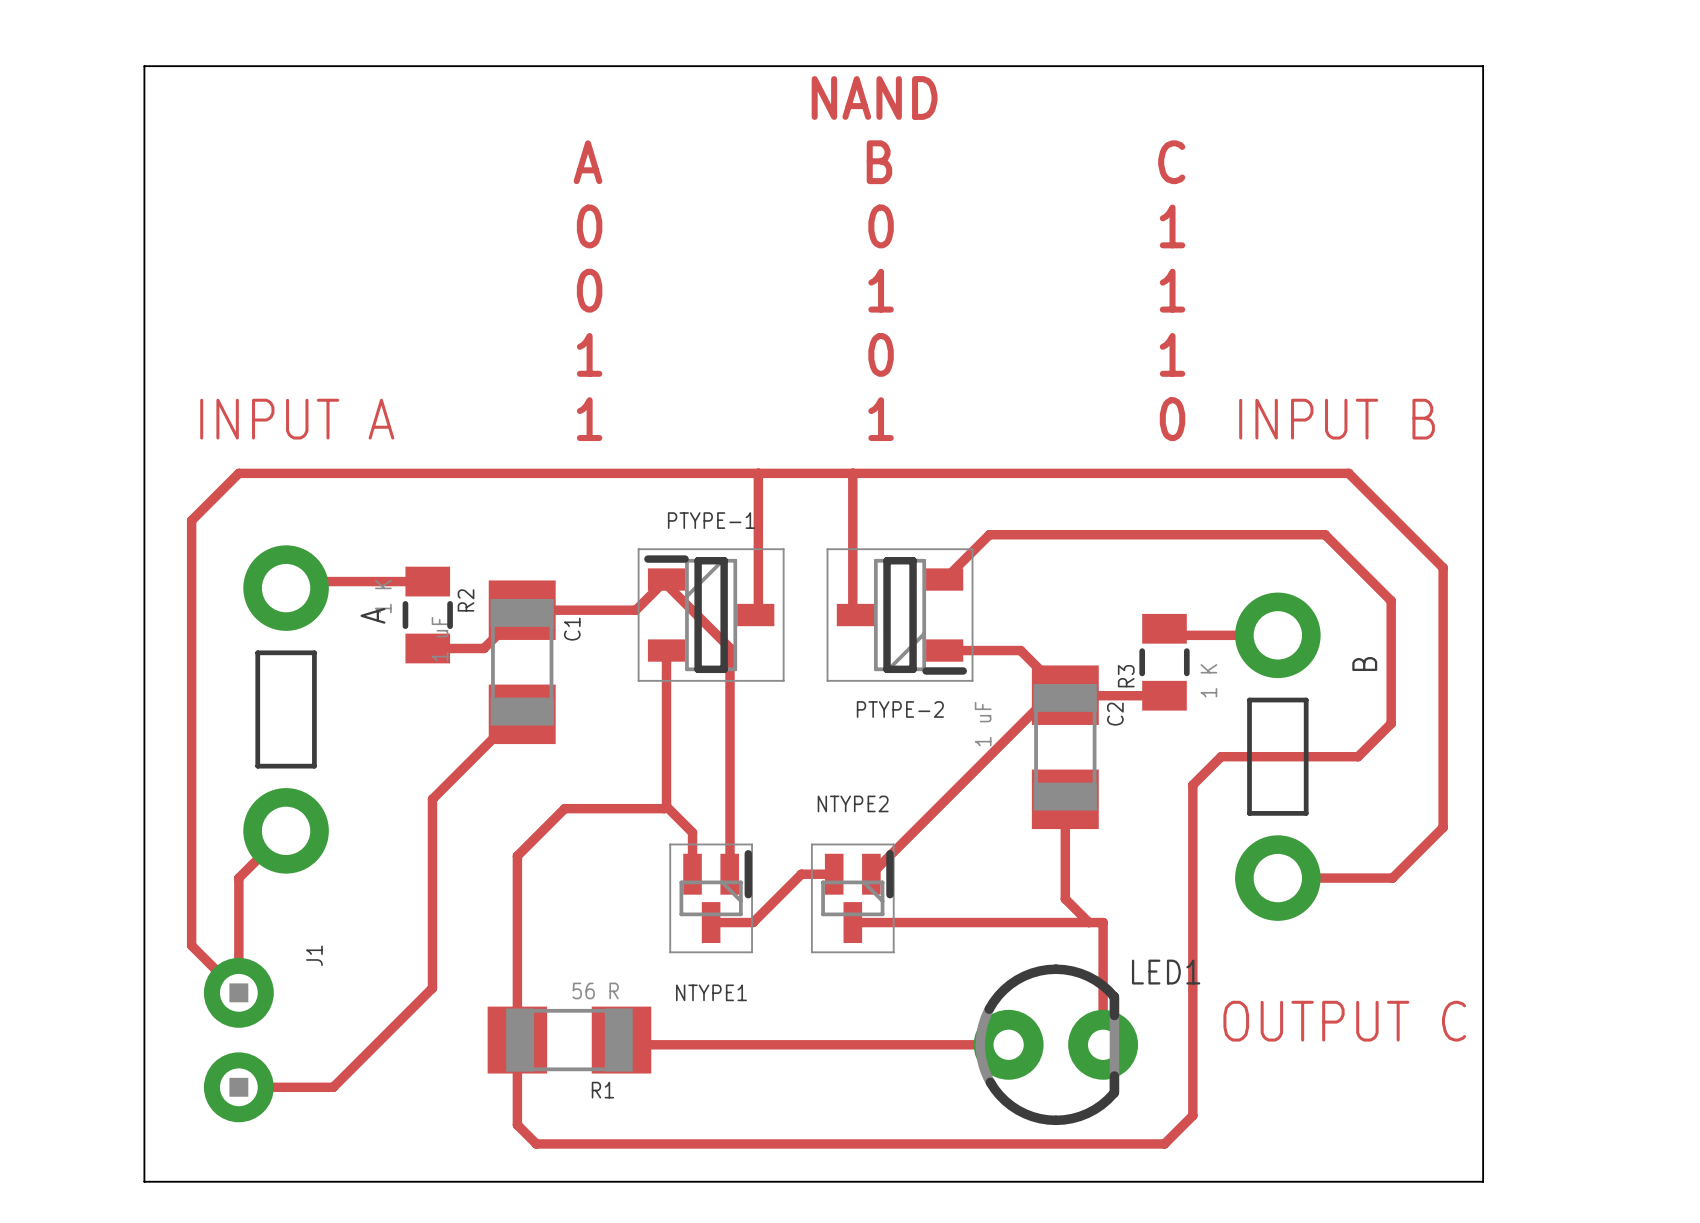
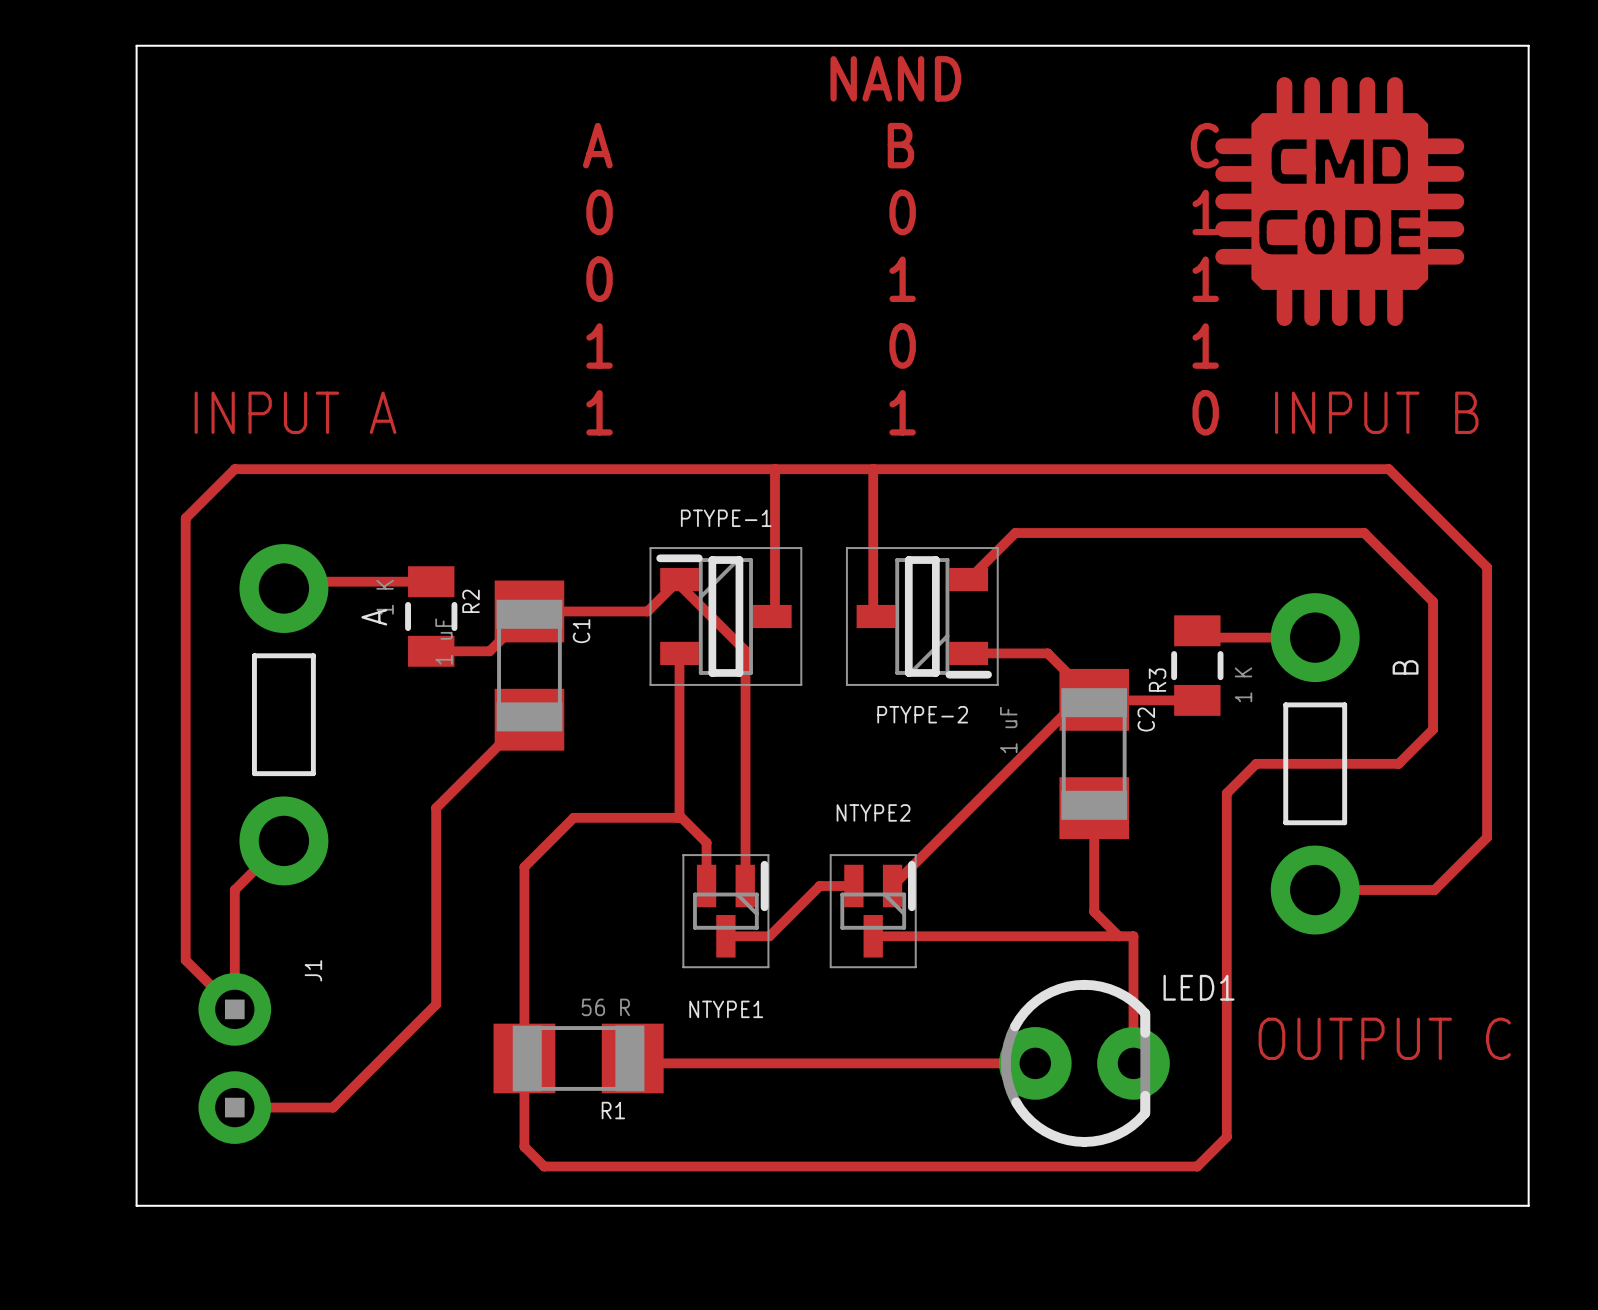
drawing: none -> [1215, 77, 1465, 327]

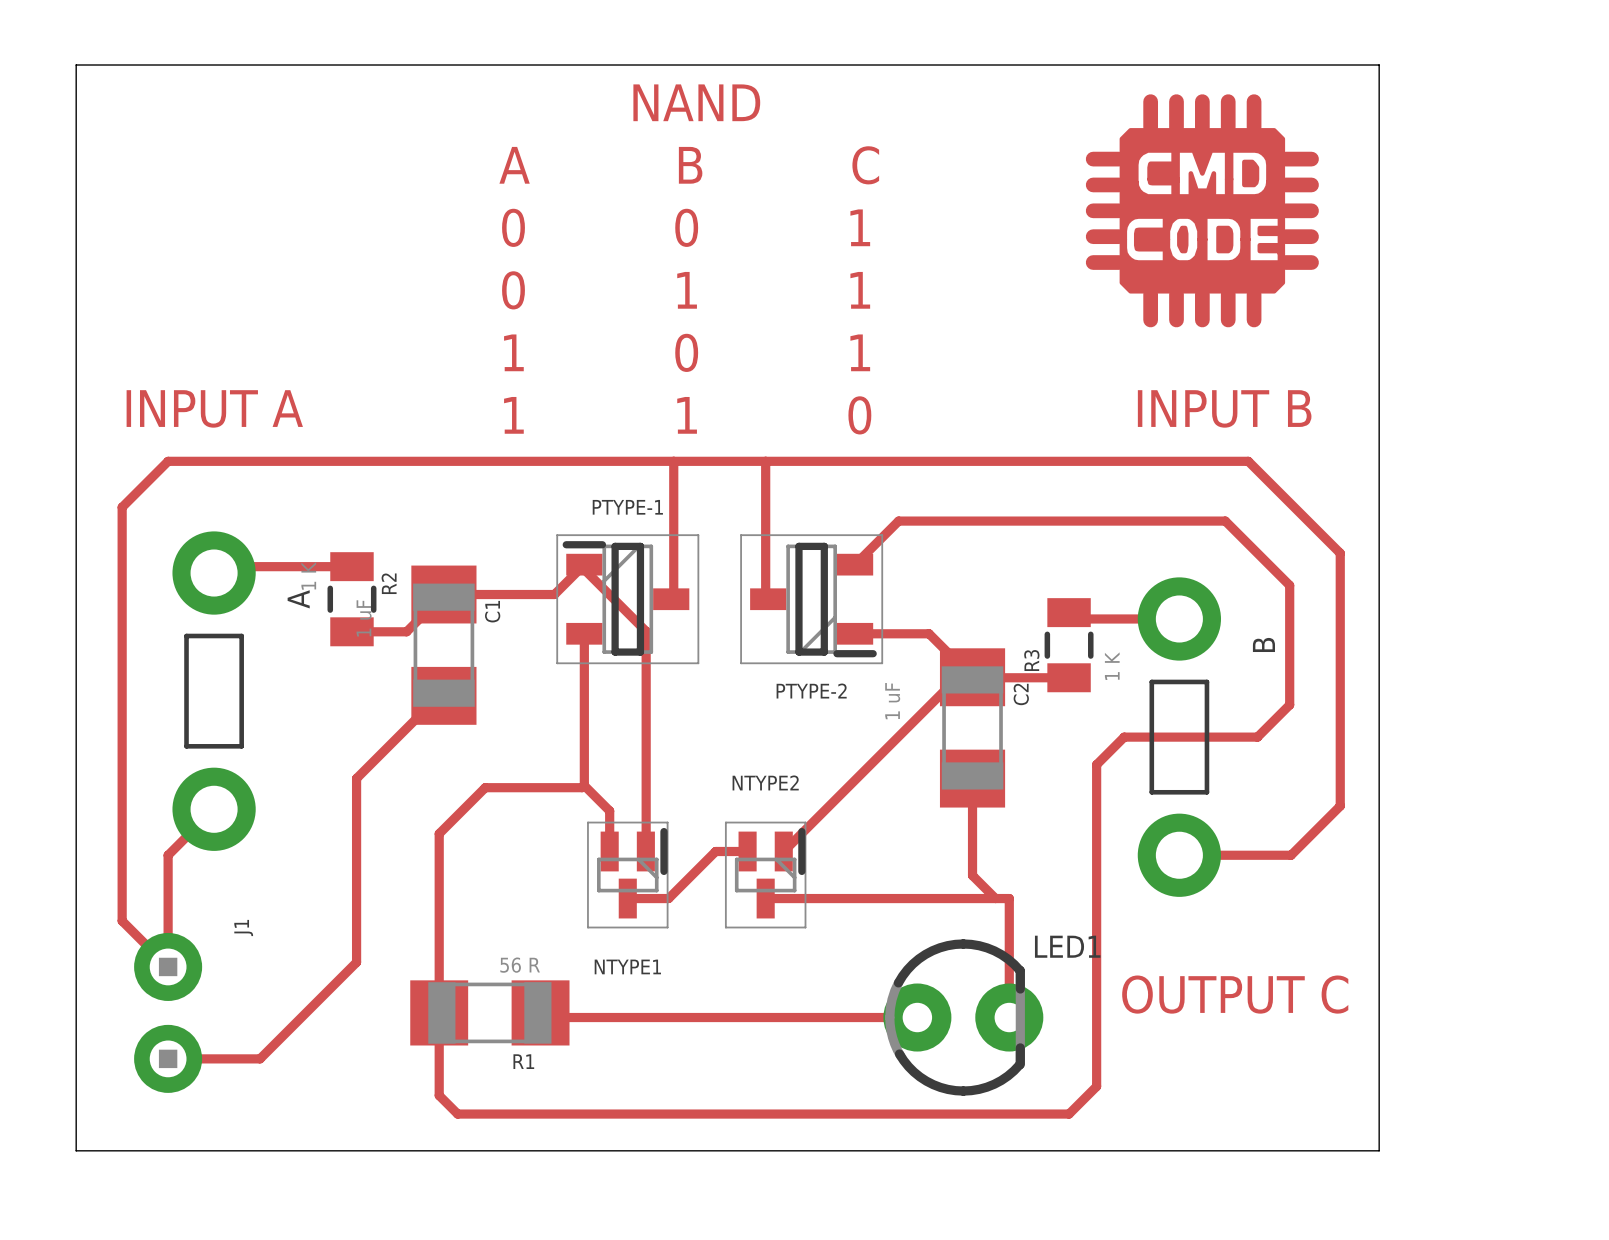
drawing: none -> [499, 84, 880, 435]
text: NAND (895, 78) -> none
text: A B C (900, 145) -> none
text: 0 0 1 (902, 212) -> none
text: 0 1 1 (902, 279) -> none
text: 1 0 1 (902, 346) -> none
text: 1 1 0 (902, 412) -> none

